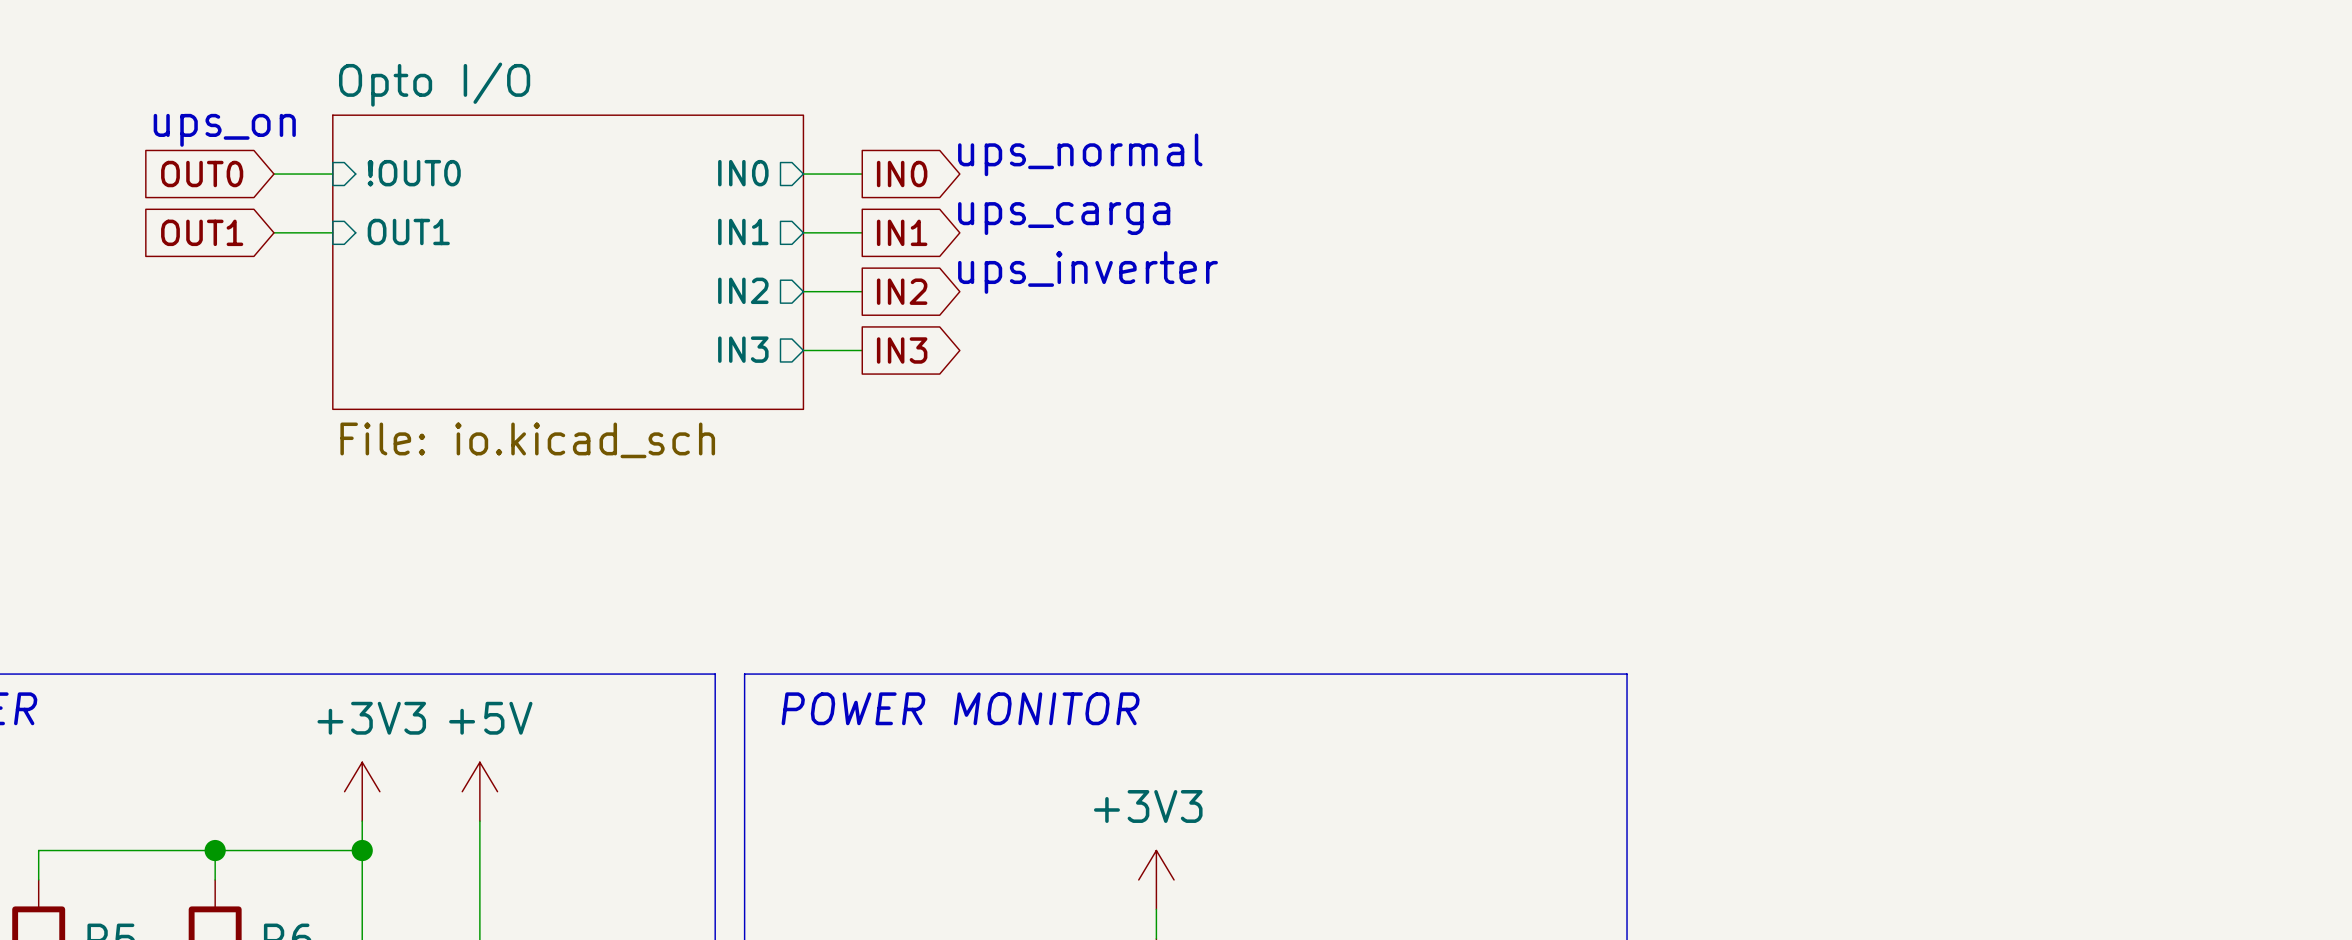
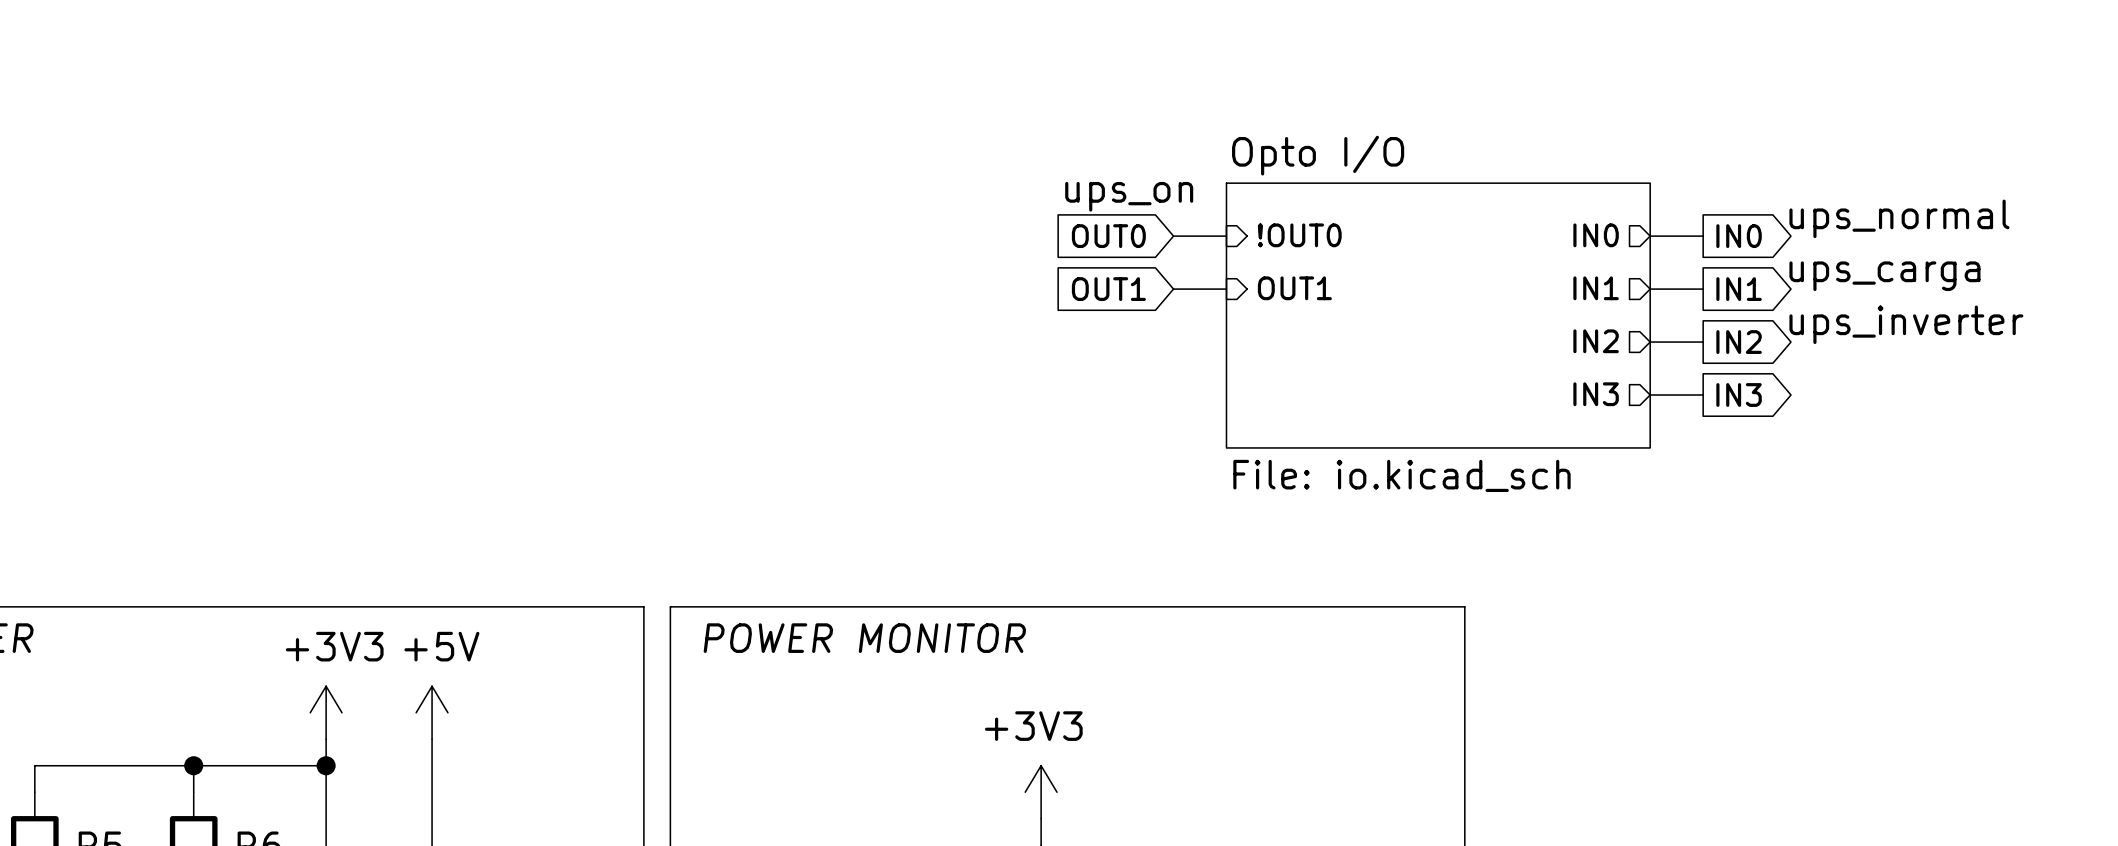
text: ups_on (224, 130) -> none
text: ups_normal (1080, 154) -> ups_on (1129, 196)
sheet pin: !OUT0 (414, 173) -> none
sheet pin: IN0 (743, 173) -> none
global label: OUT0 (202, 174) -> none
wire: (273, 174) (332, 174) -> none
wire: (803, 174) (862, 174) -> none
global label: IN0 (902, 174) -> none
text: ups_carga (1064, 218) -> none
sheet pin: OUT1 (408, 231) -> none
sheet pin: IN1 (743, 231) -> none
global label: OUT1 (202, 232) -> none
wire: (273, 232) (332, 232) -> none
wire: (803, 232) (862, 232) -> (1173, 236) (1226, 236)
global label: IN1 (902, 232) -> none
text: none -> ups_normal (1899, 218)
sheet pin: none -> !OUT0 (1299, 235)
sheet pin: none -> IN0 (1596, 235)
sheet Opto I/O: File: io.kicad_sch (568, 262) -> none
global label: none -> OUT0 (1108, 236)
wire: none -> (1650, 236) (1703, 236)
global label: none -> IN0 (1739, 236)
text: ups_inverter (1087, 272) -> none
sheet pin: IN2 (743, 290) -> none
wire: (803, 291) (862, 291) -> (1173, 289) (1226, 289)
global label: IN2 (902, 291) -> none
text: none -> ups_carga (1884, 276)
sheet pin: none -> OUT1 (1294, 288)
sheet pin: none -> IN1 (1596, 288)
global label: none -> OUT1 (1108, 289)
wire: none -> (1650, 289) (1703, 289)
global label: none -> IN1 (1739, 289)
sheet pin: IN3 (743, 349) -> none
wire: (803, 350) (862, 350) -> none
global label: IN3 (902, 350) -> none
sheet Opto I/O: none -> File: io.kicad_sch (1438, 315)
text: none -> ups_inverter (1906, 324)
sheet pin: none -> IN2 (1596, 341)
wire: none -> (1650, 342) (1703, 342)
global label: none -> IN2 (1739, 342)
sheet pin: none -> IN3 (1596, 394)
wire: none -> (1650, 395) (1703, 395)
global label: none -> IN3 (1739, 395)

